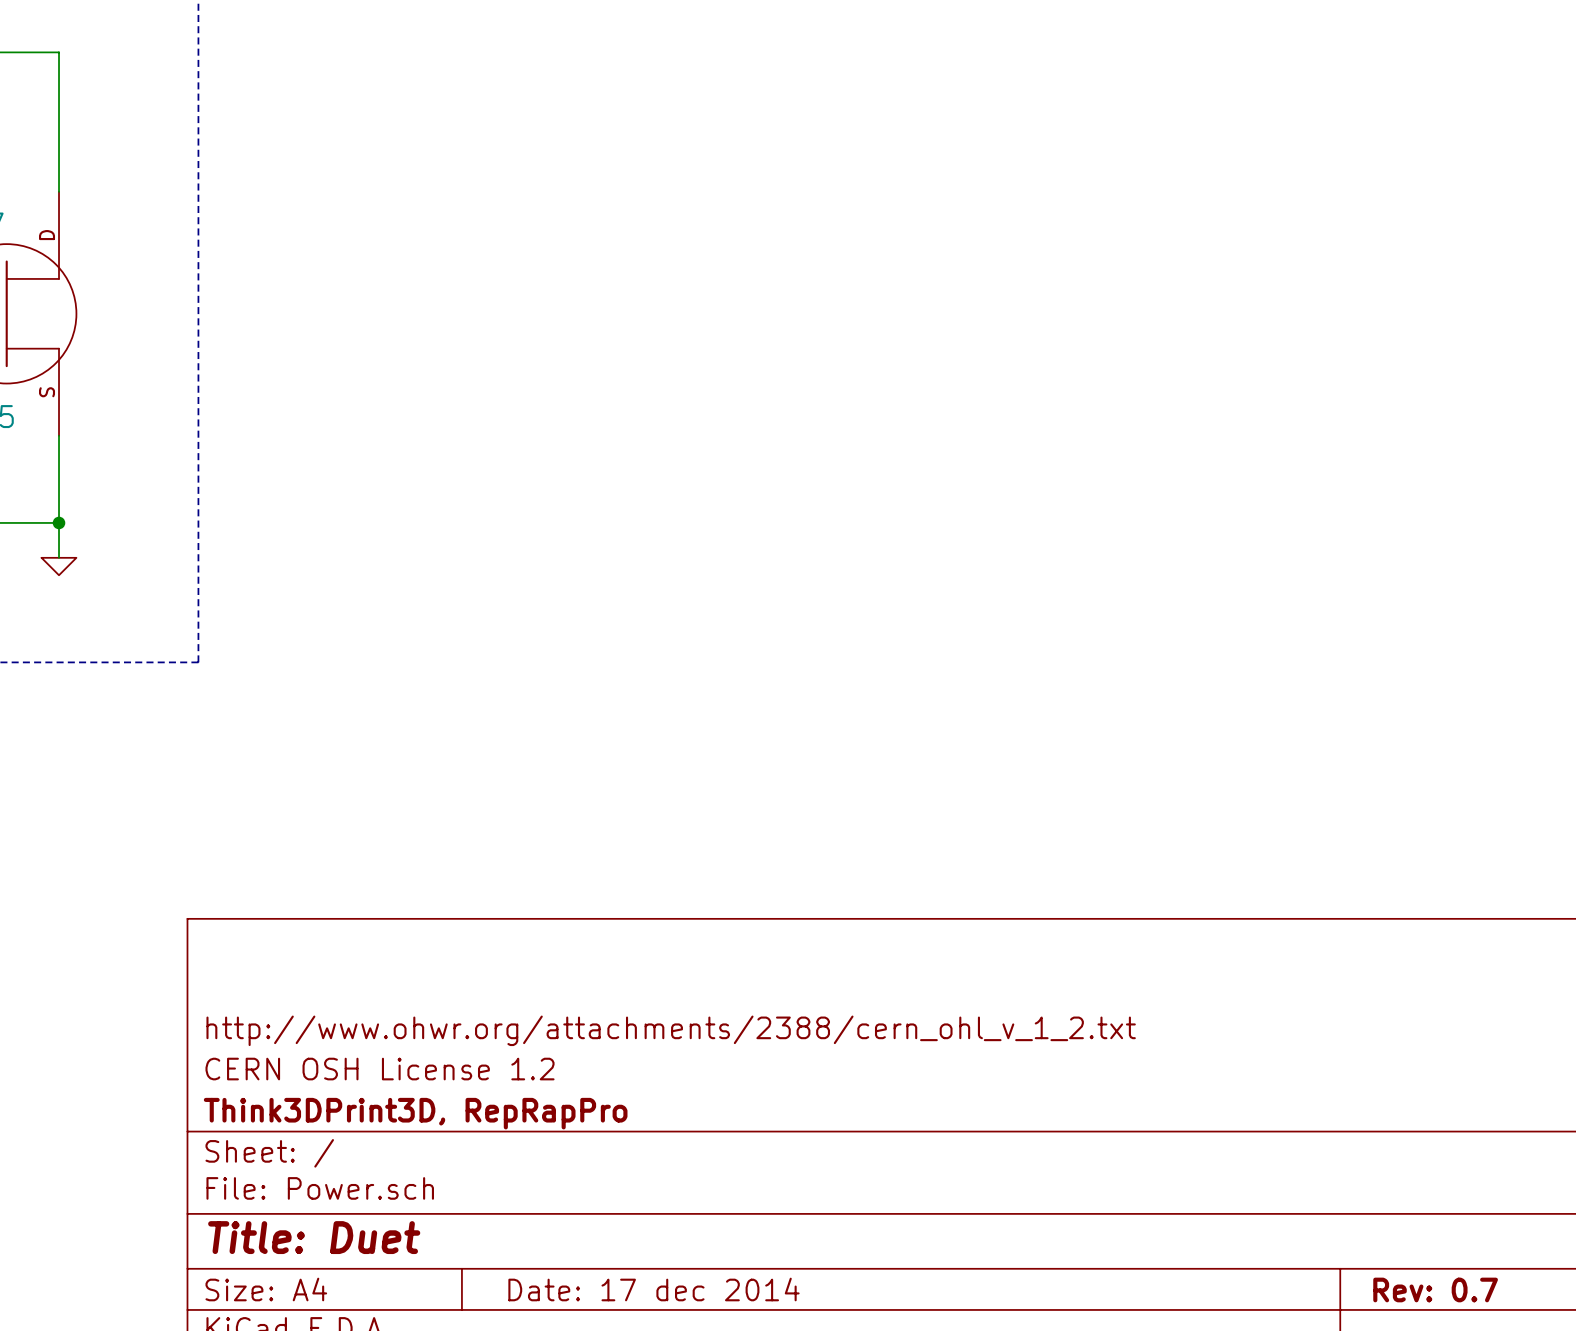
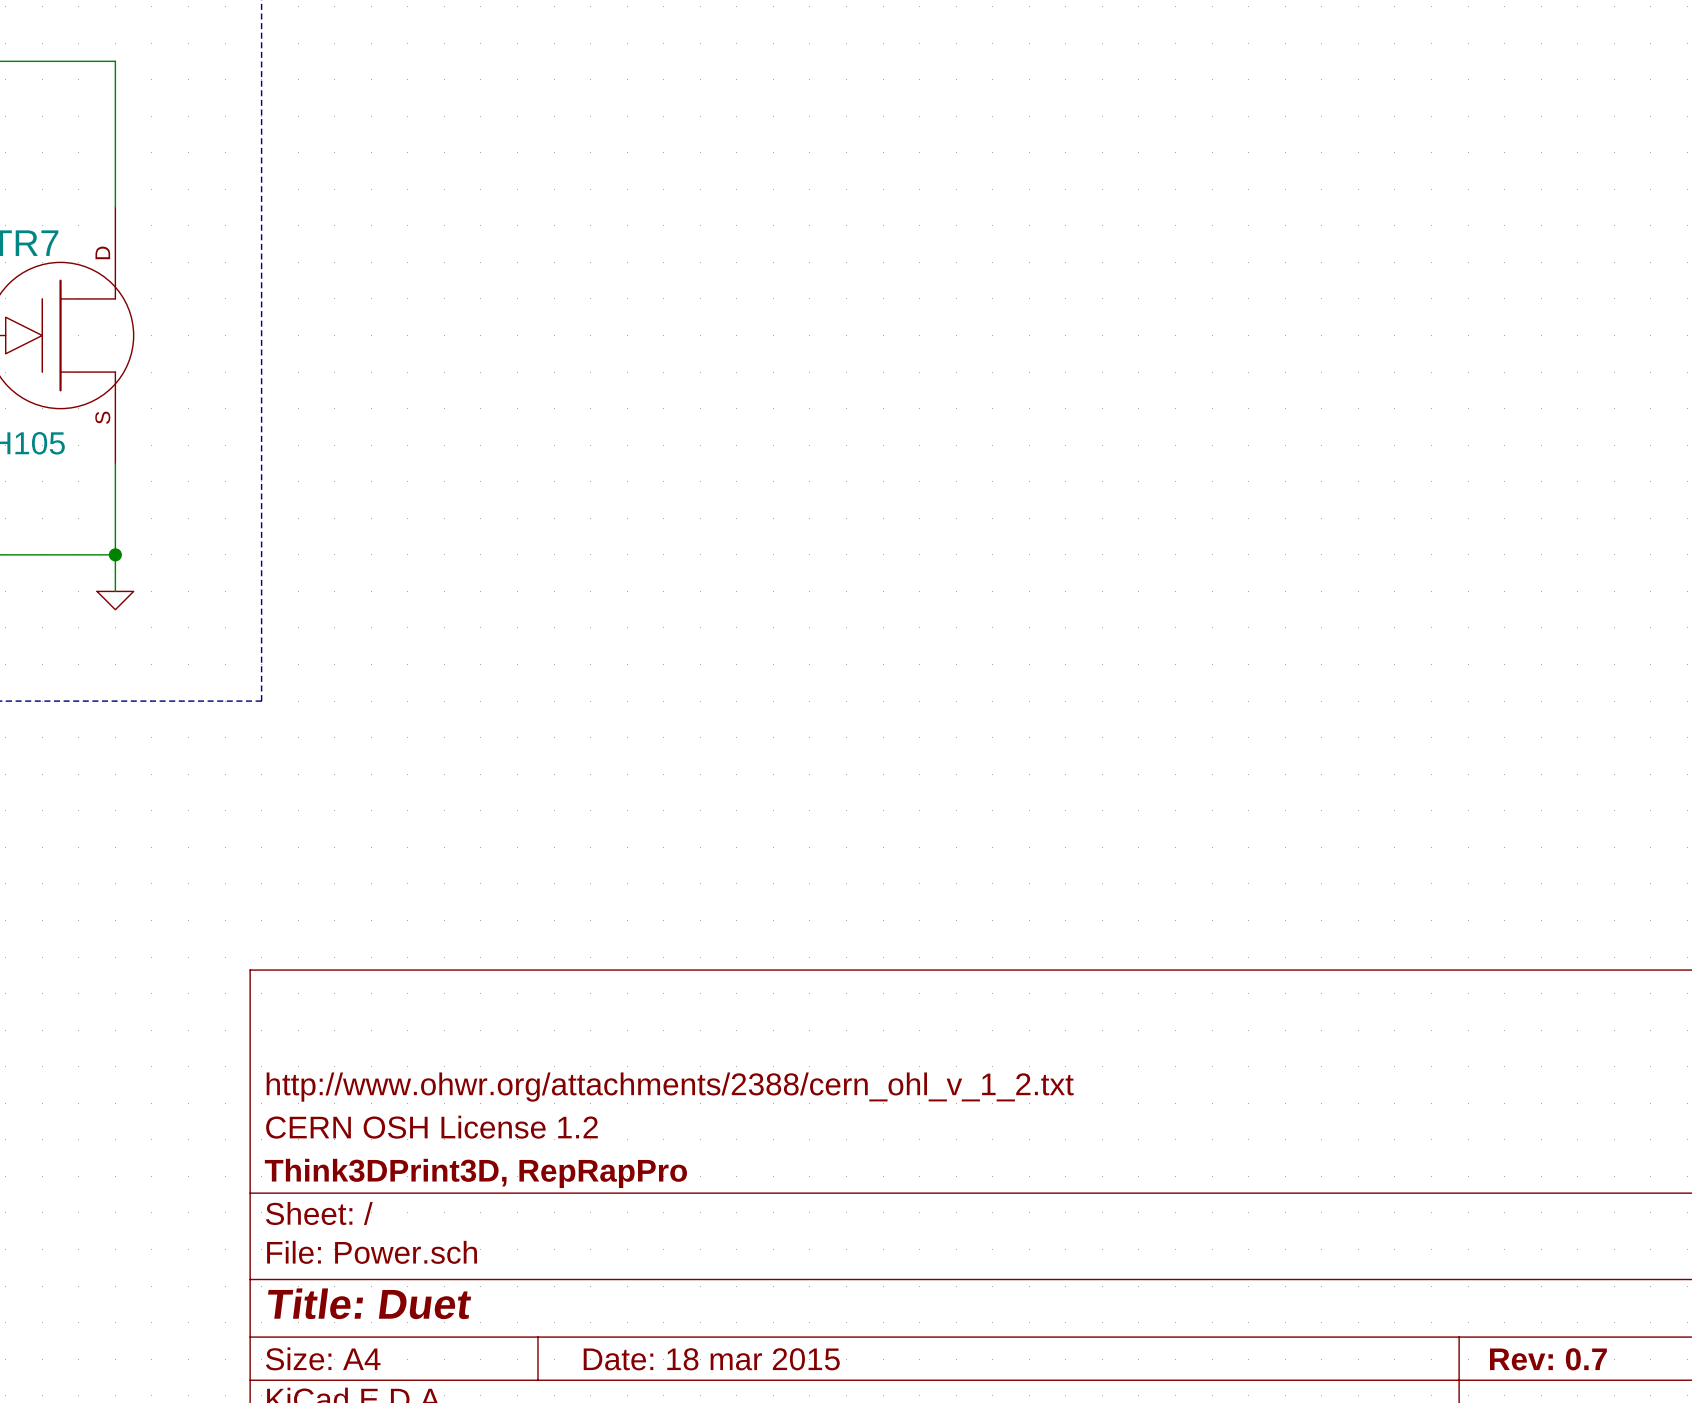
title block: Date: 17 dec 2014 (653, 1289) -> Date: 18 mar 2015 (711, 1359)

